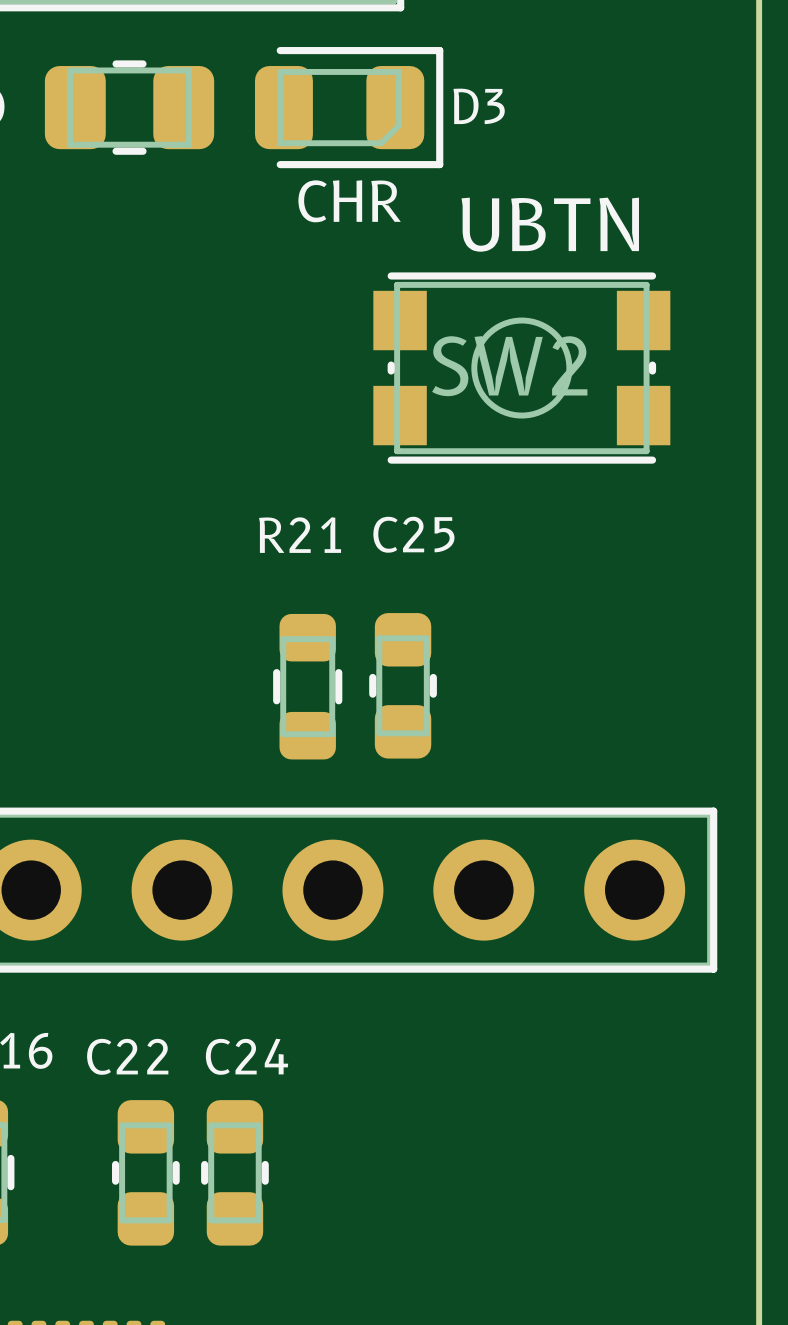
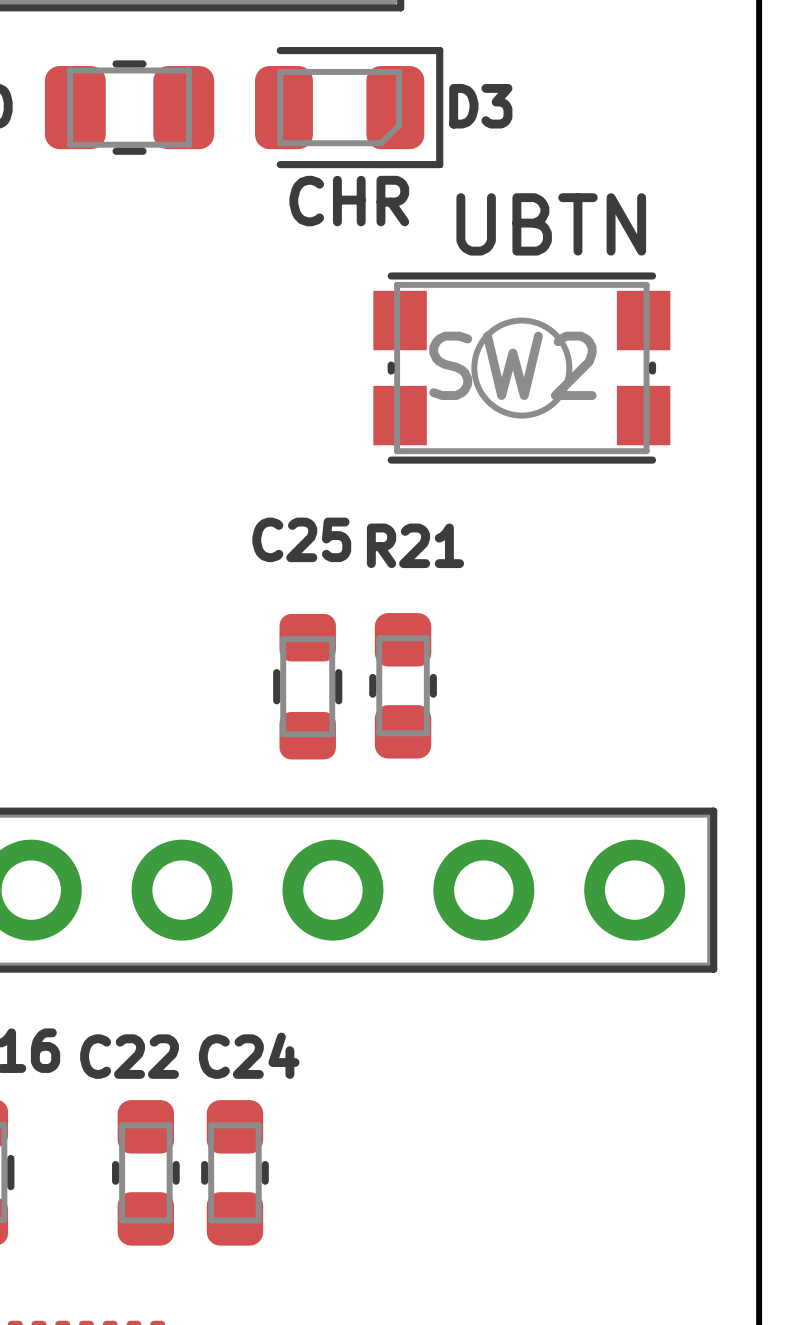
C25 name position: C25 (413, 534) -> C25 (301, 539)
R21 name position: R21 (300, 535) -> R21 (415, 545)

